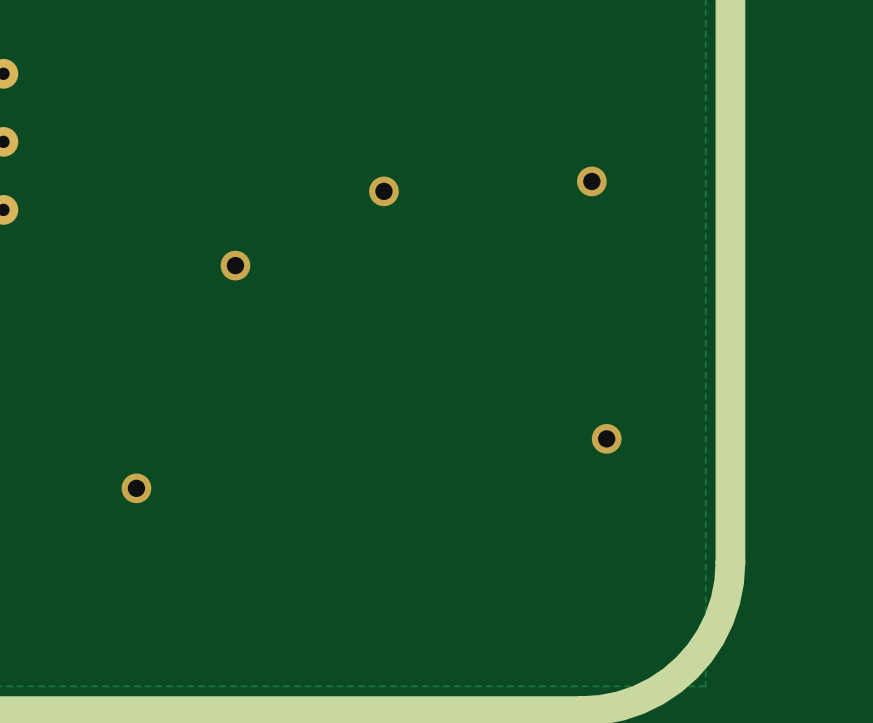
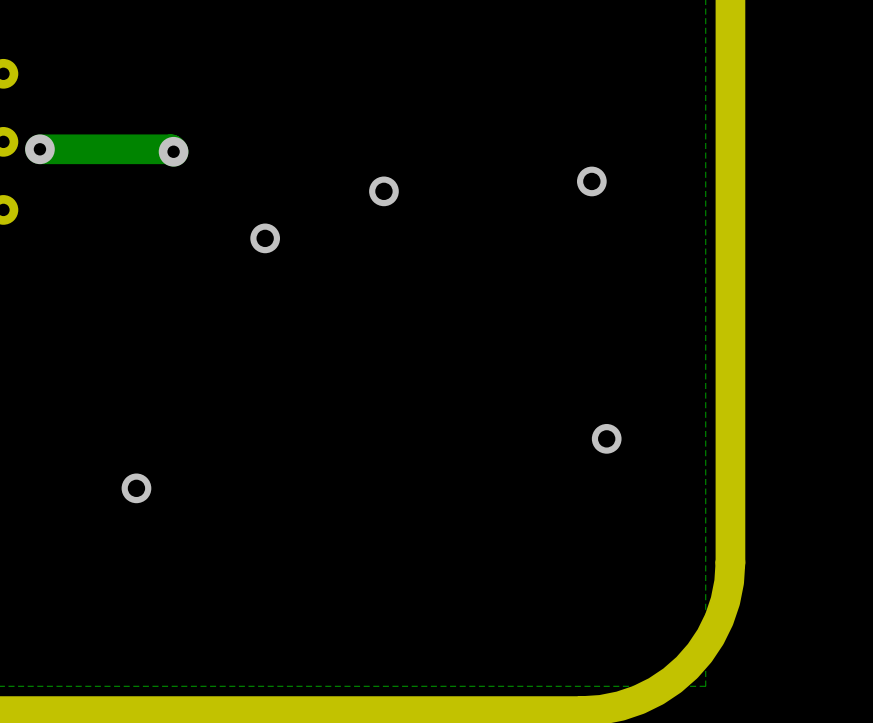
track: none -> (39, 149) (171, 149) (173, 151)
via: none -> (39, 149)
via: none -> (173, 151)
via position: (235, 265) -> (265, 238)

